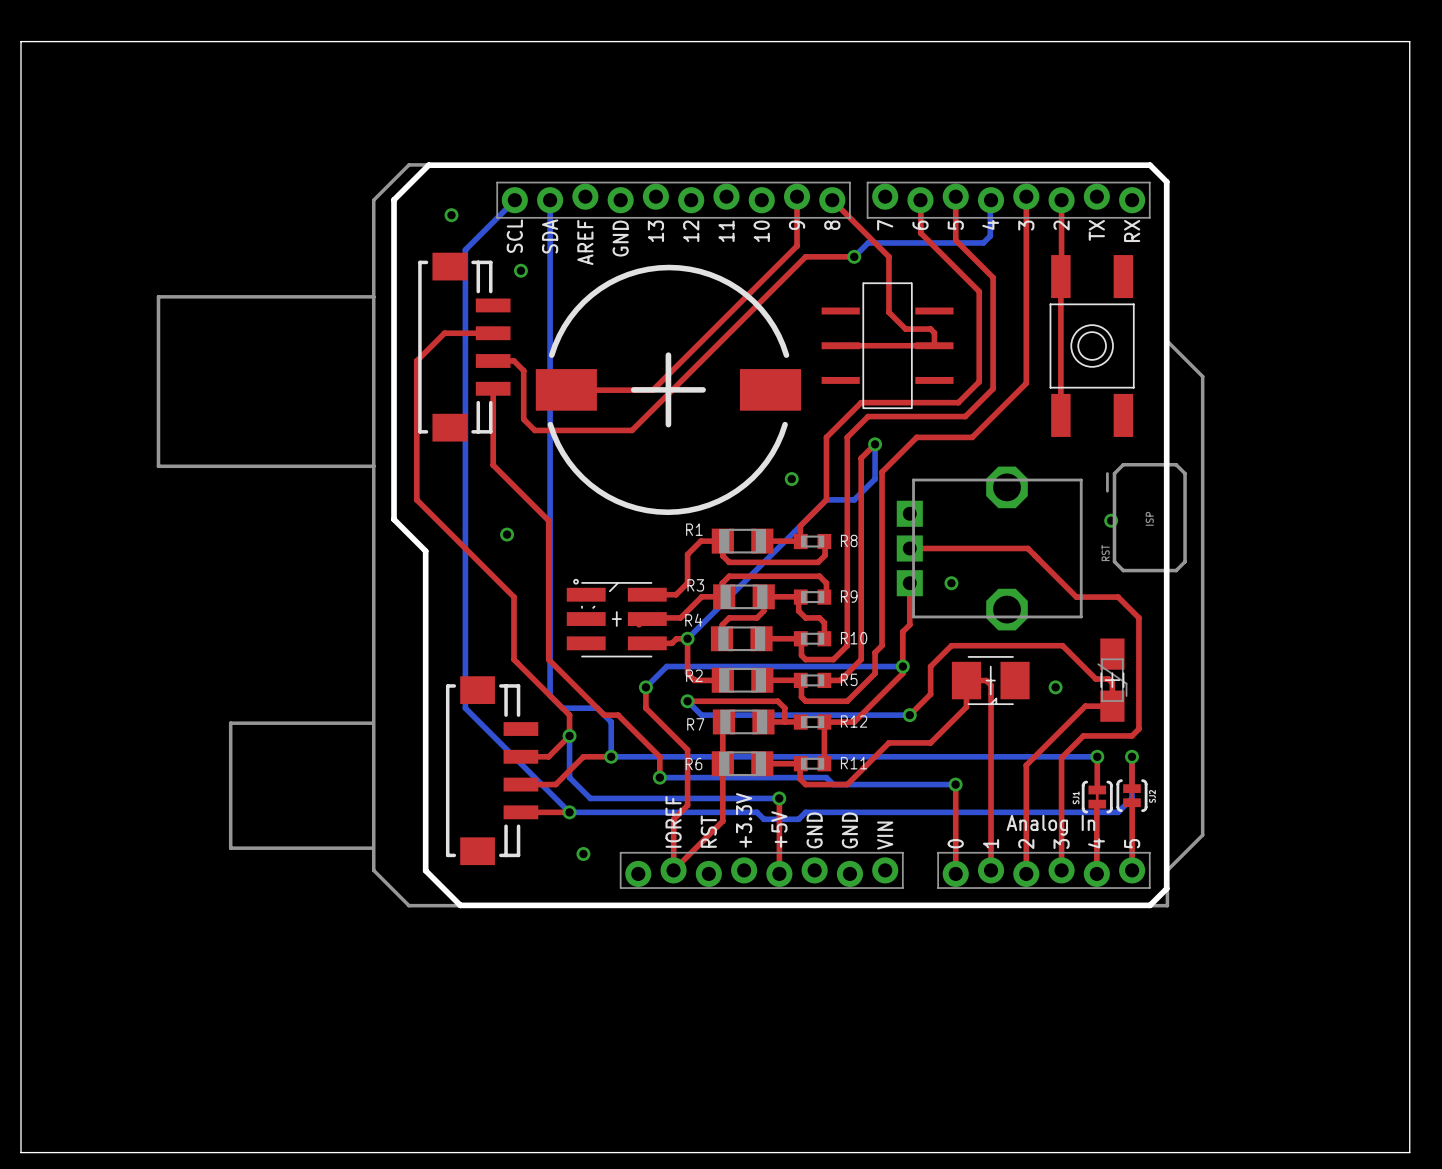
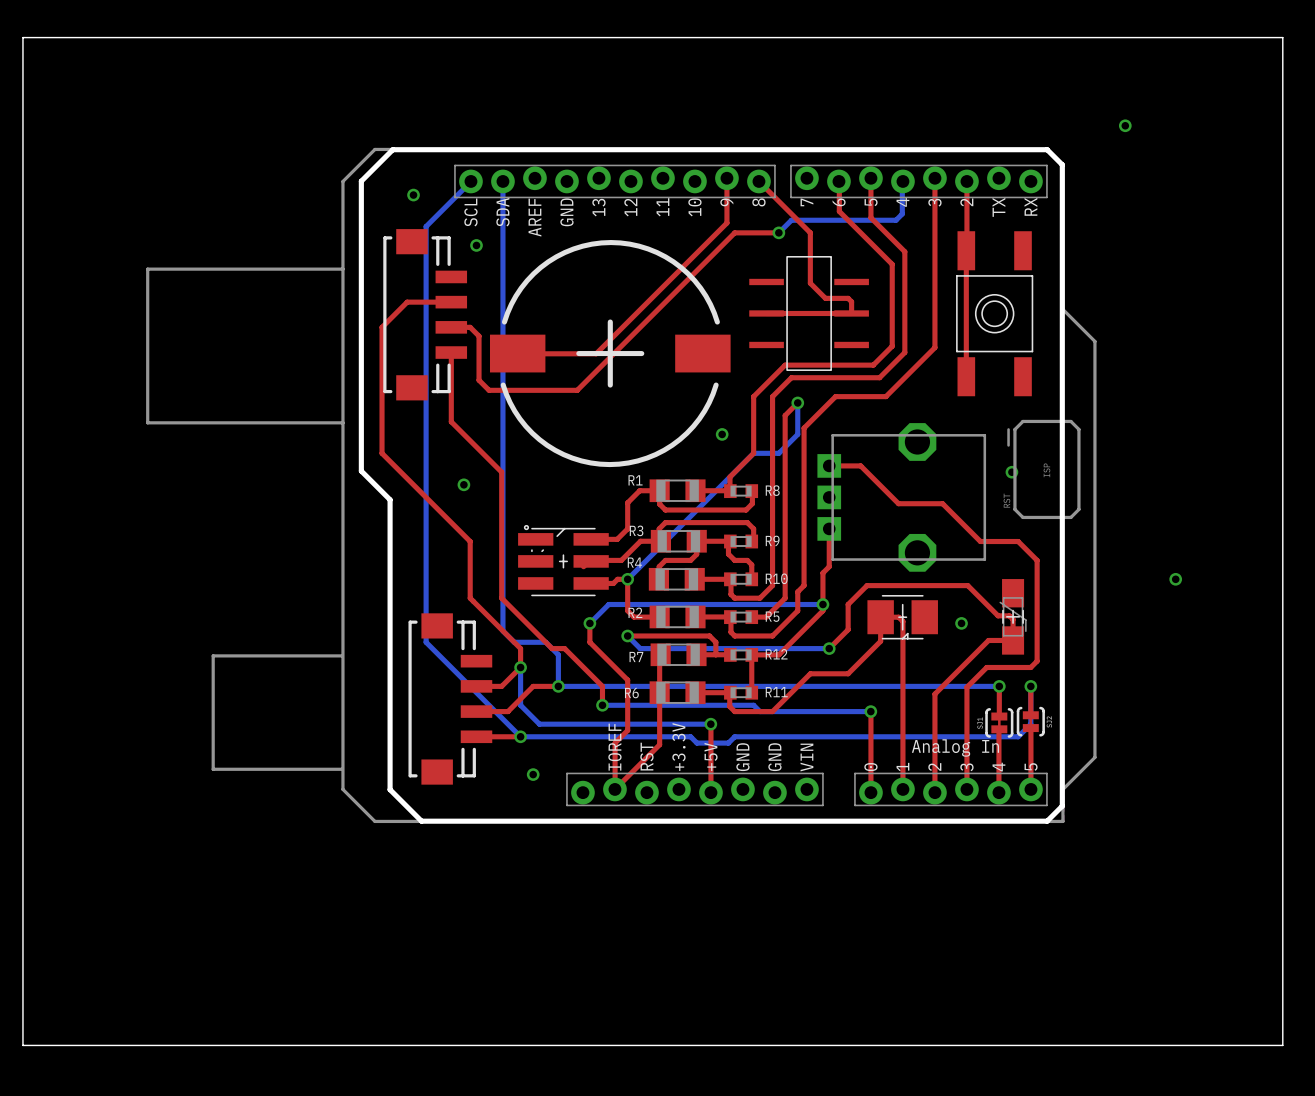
via: none -> (1125, 125)
top track: (909, 548) (1027, 548) (1034, 555) -> (829, 465) (860, 465) (898, 503) (942, 503)
via: (951, 583) -> none
via: none -> (1175, 579)

